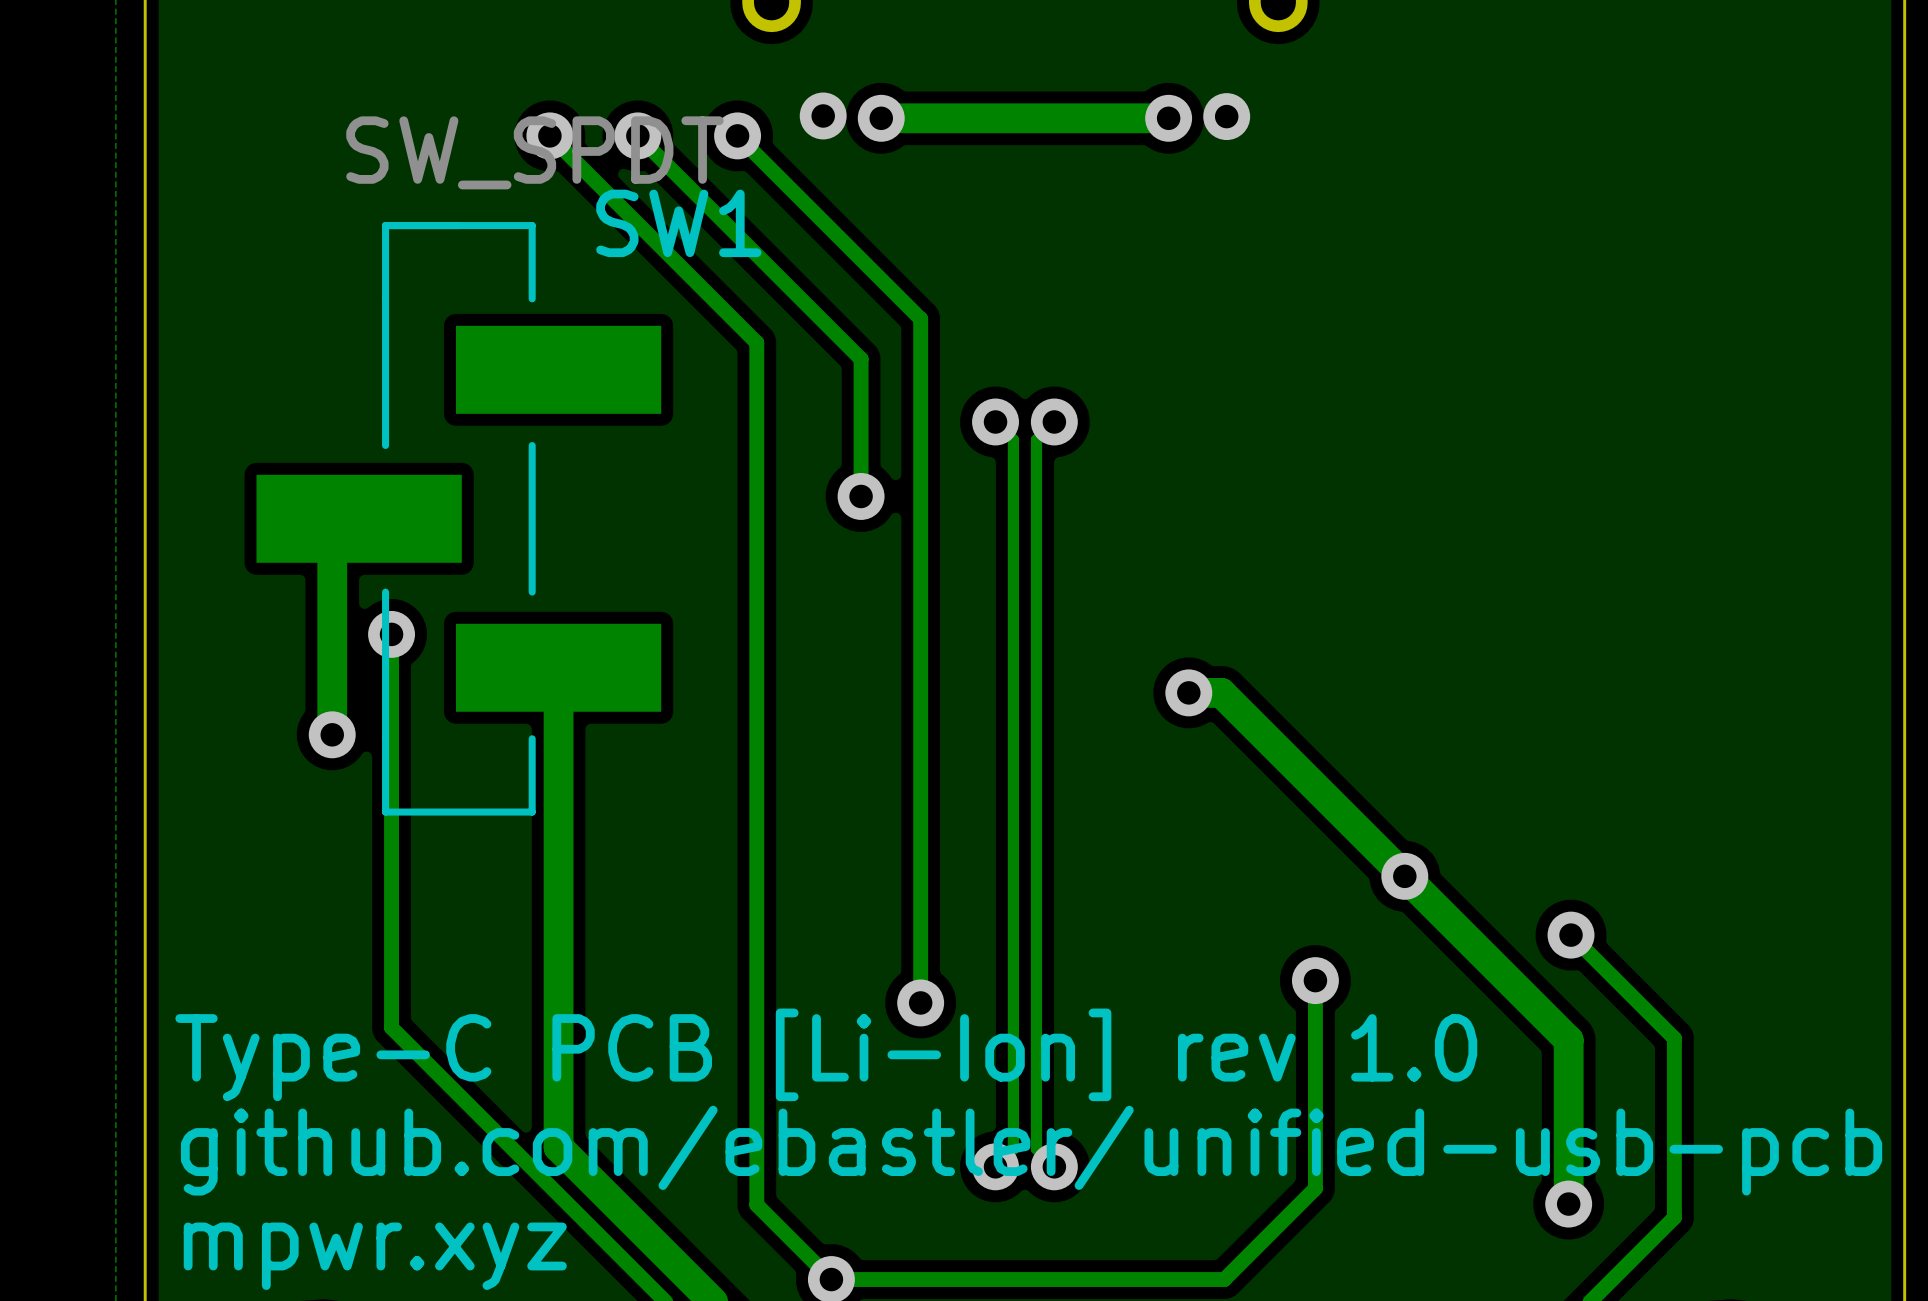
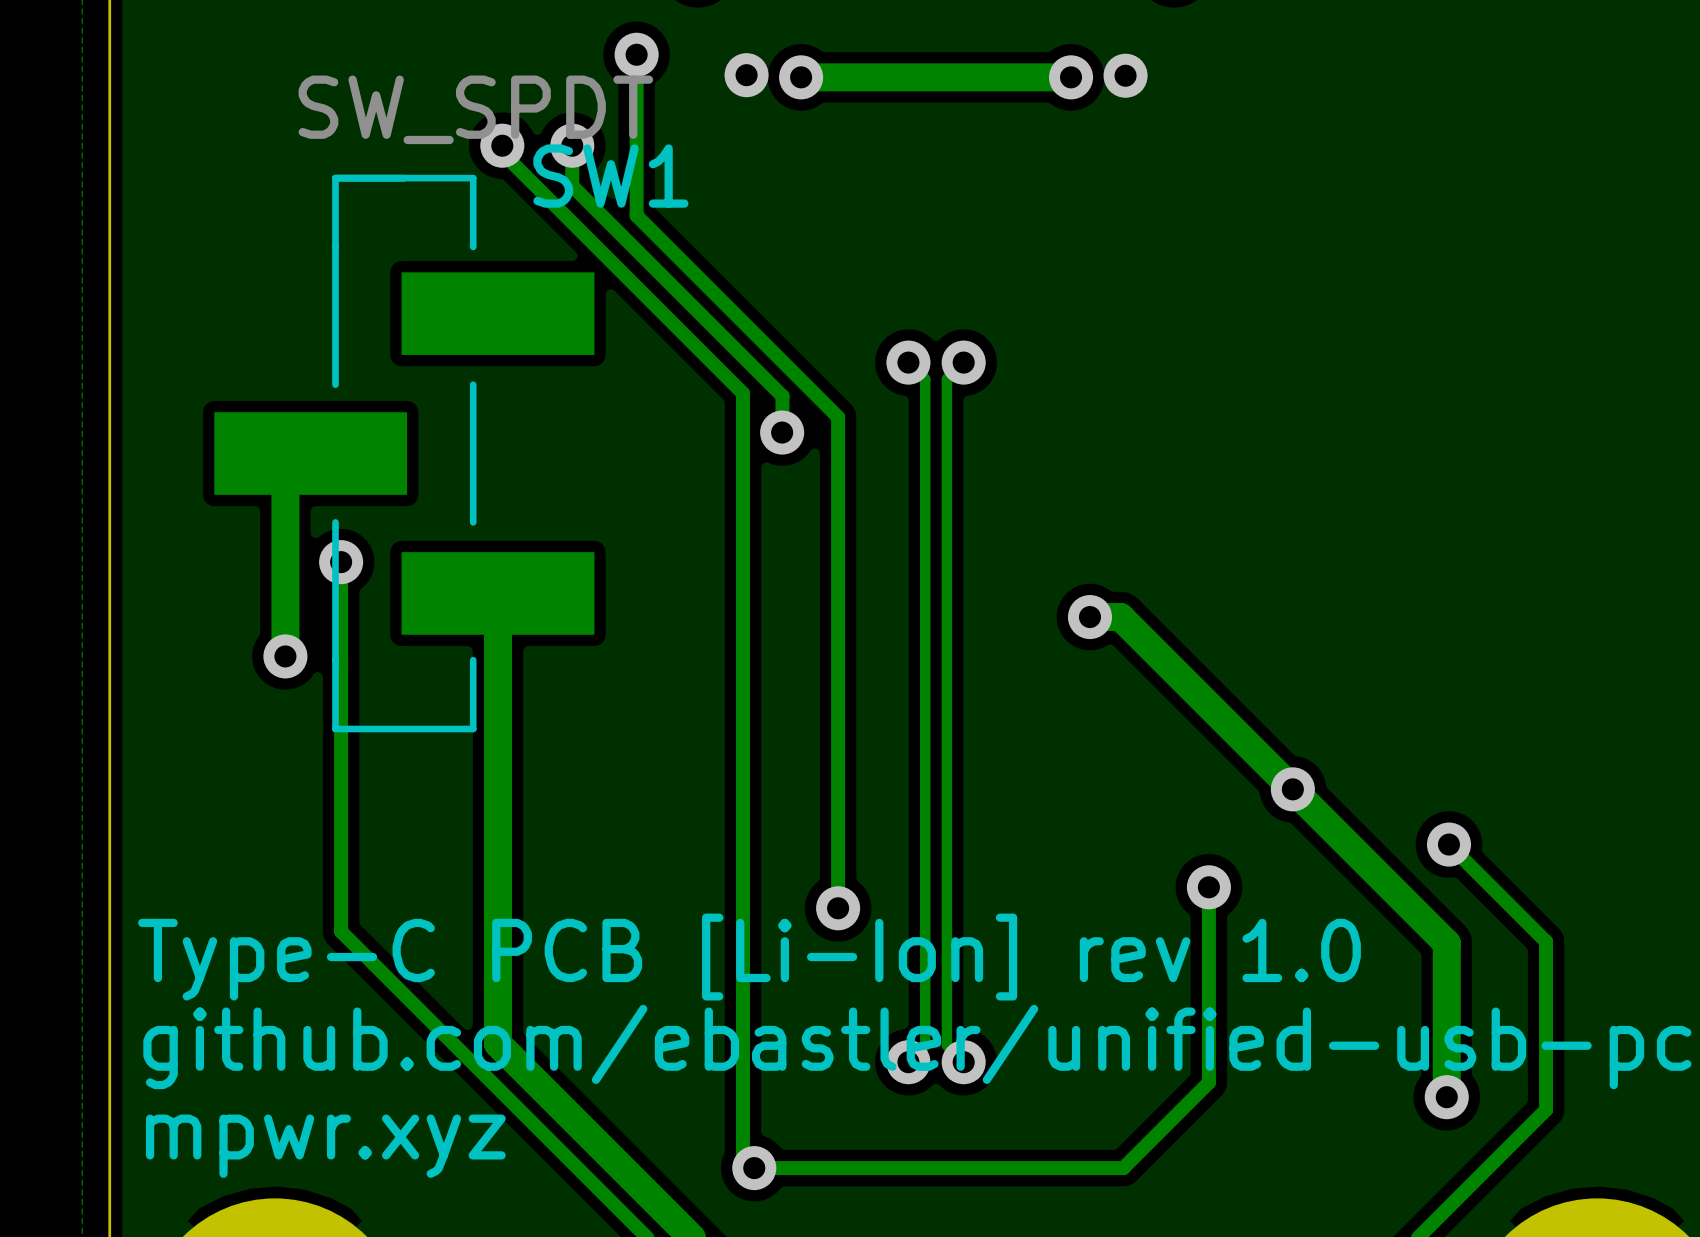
track: (549, 135) (756, 342) (756, 1204) (819, 1267) -> (502, 145) (502, 152) (742, 393) (742, 1156)
via: (549, 135) -> none
track: (637, 135) (861, 359) (861, 457) -> (572, 145) (572, 185) (782, 396)
via: (637, 135) -> none
track: (737, 135) (920, 318) (920, 480) -> (636, 54) (636, 215) (838, 417)
via position: (737, 135) -> (636, 54)
via: none -> (502, 145)
via: none -> (572, 145)

